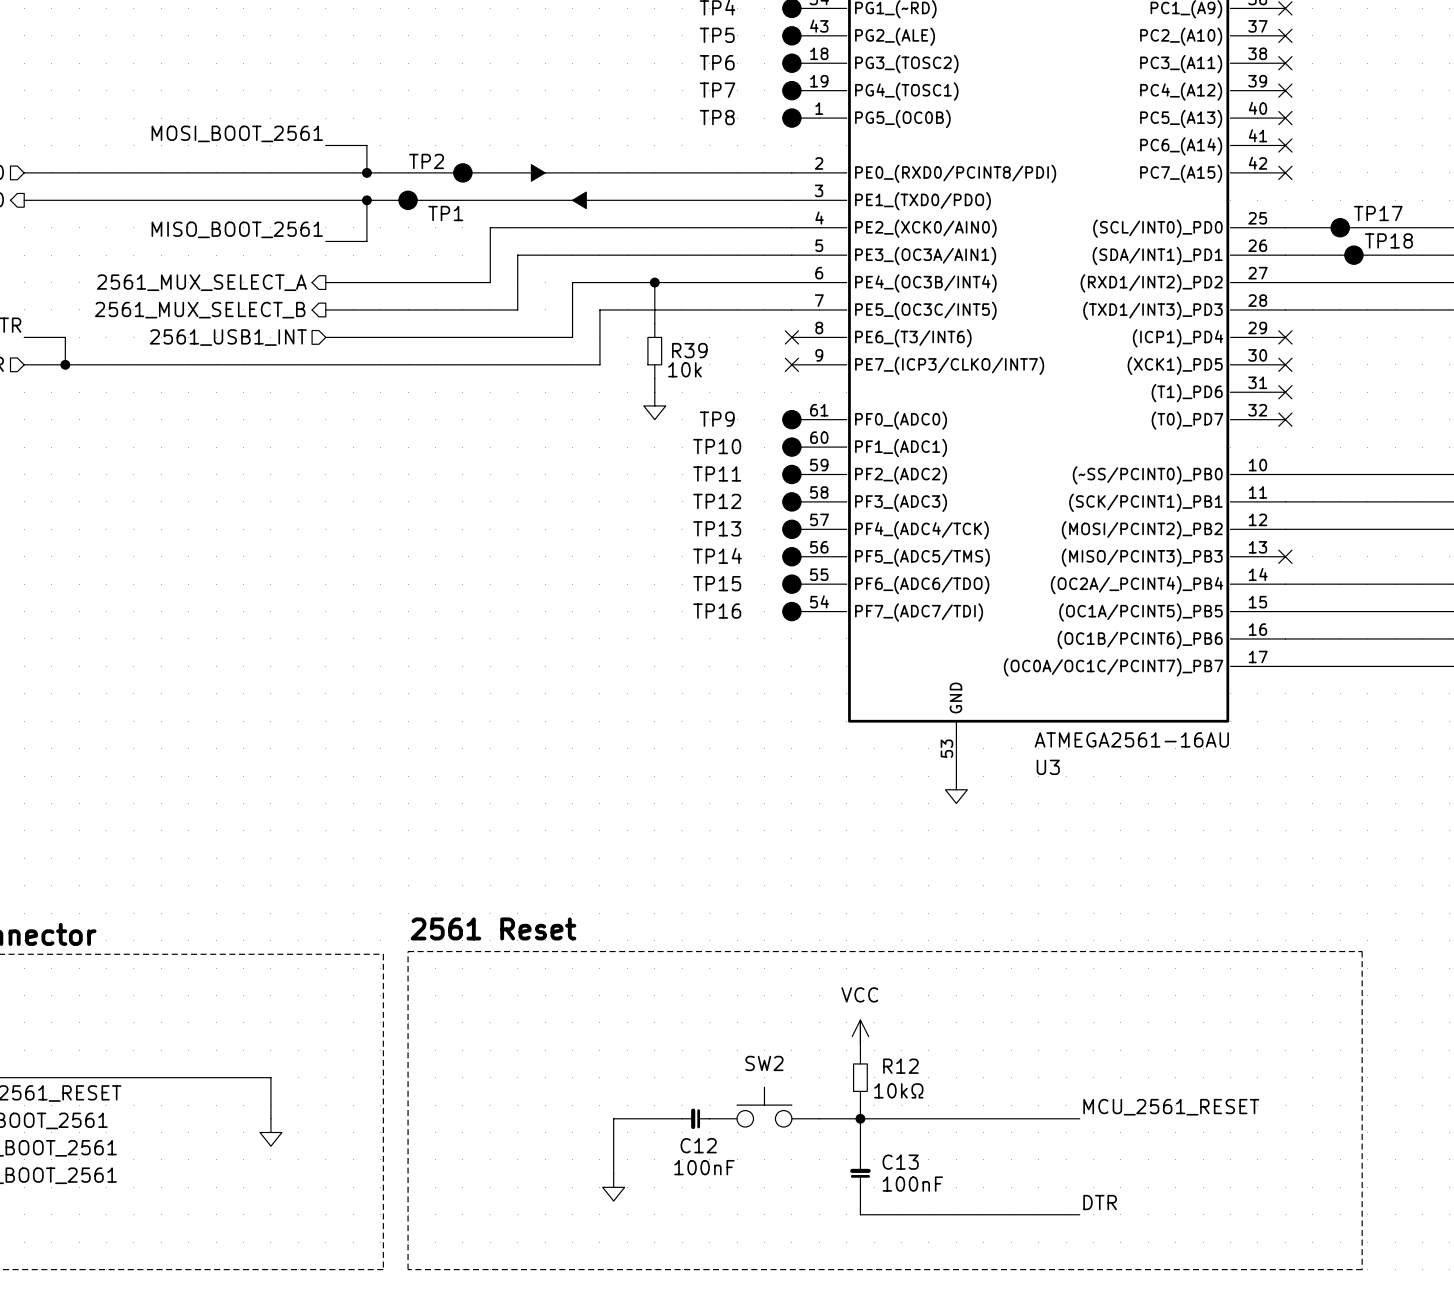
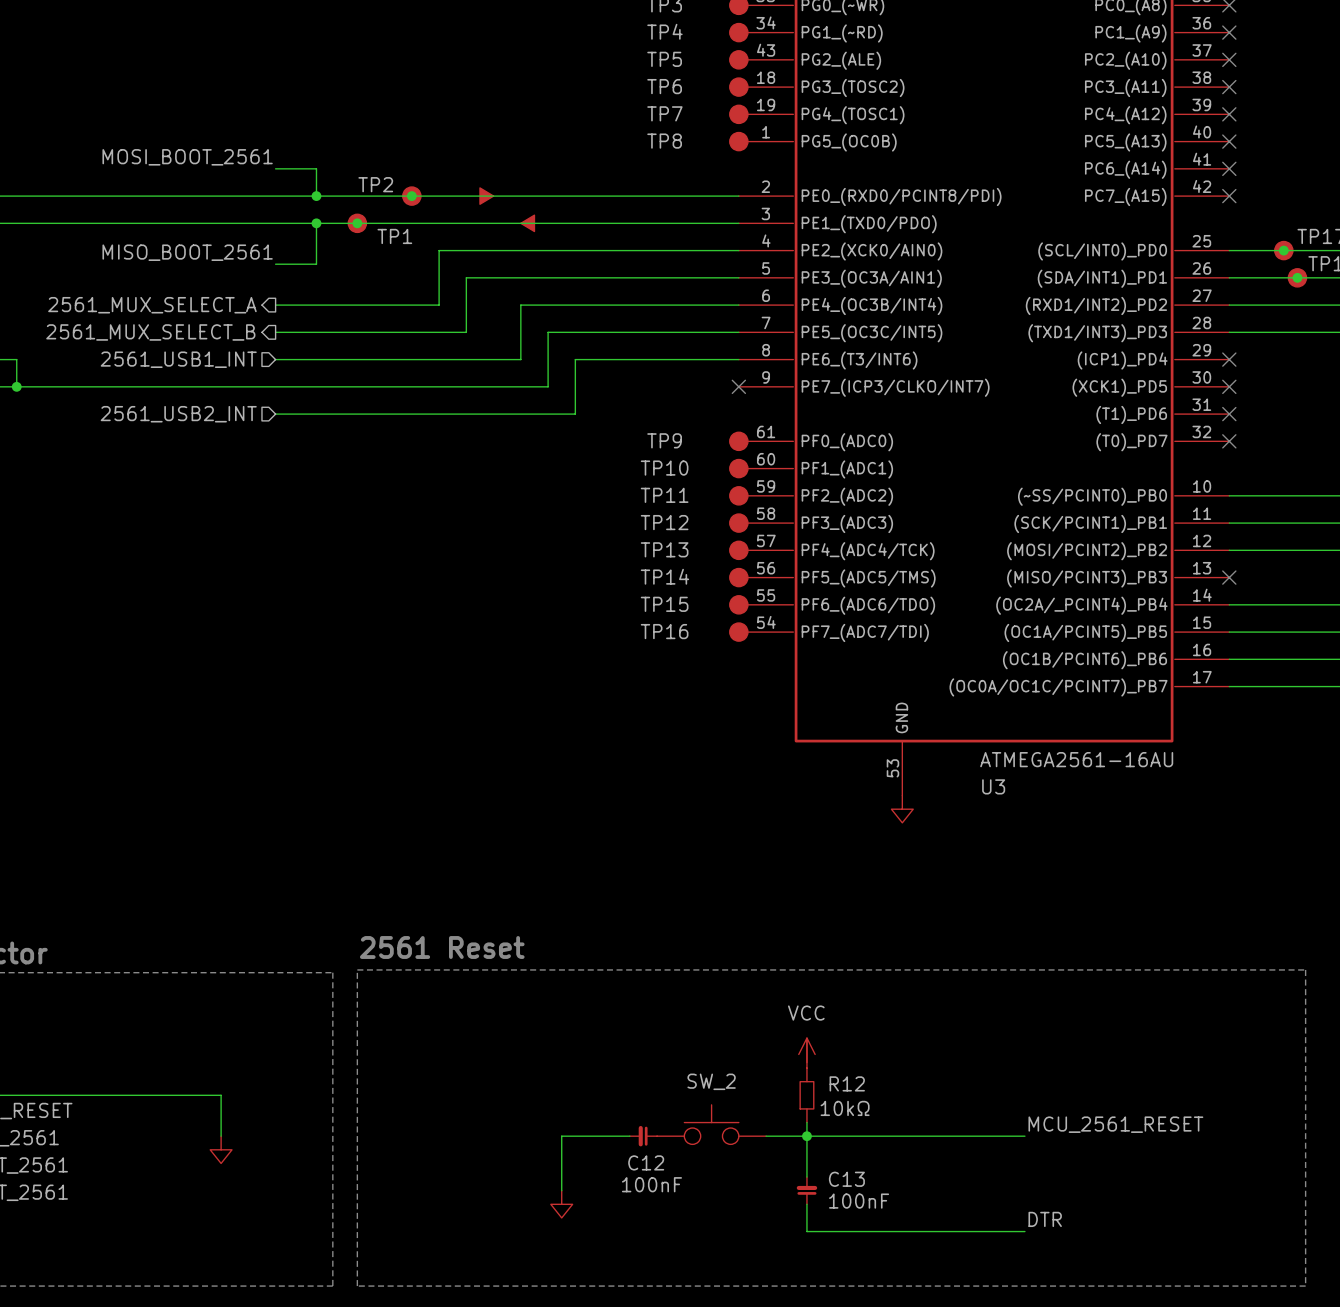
wire: (654, 282) (654, 323) -> none
junction: (654, 282) -> none
wire: none -> (738, 359) (575, 359) (575, 414) (275, 414)
no-connect mark: (791, 337) -> none
R39: 10k (654, 351) -> none
wire: (654, 378) (654, 392) -> none
hierarchical label: none -> 2561_USB2_INT (178, 414)
power symbol: (654, 405) -> none
SW2 name: SW2 (764, 1063) -> SW_2 (711, 1081)

